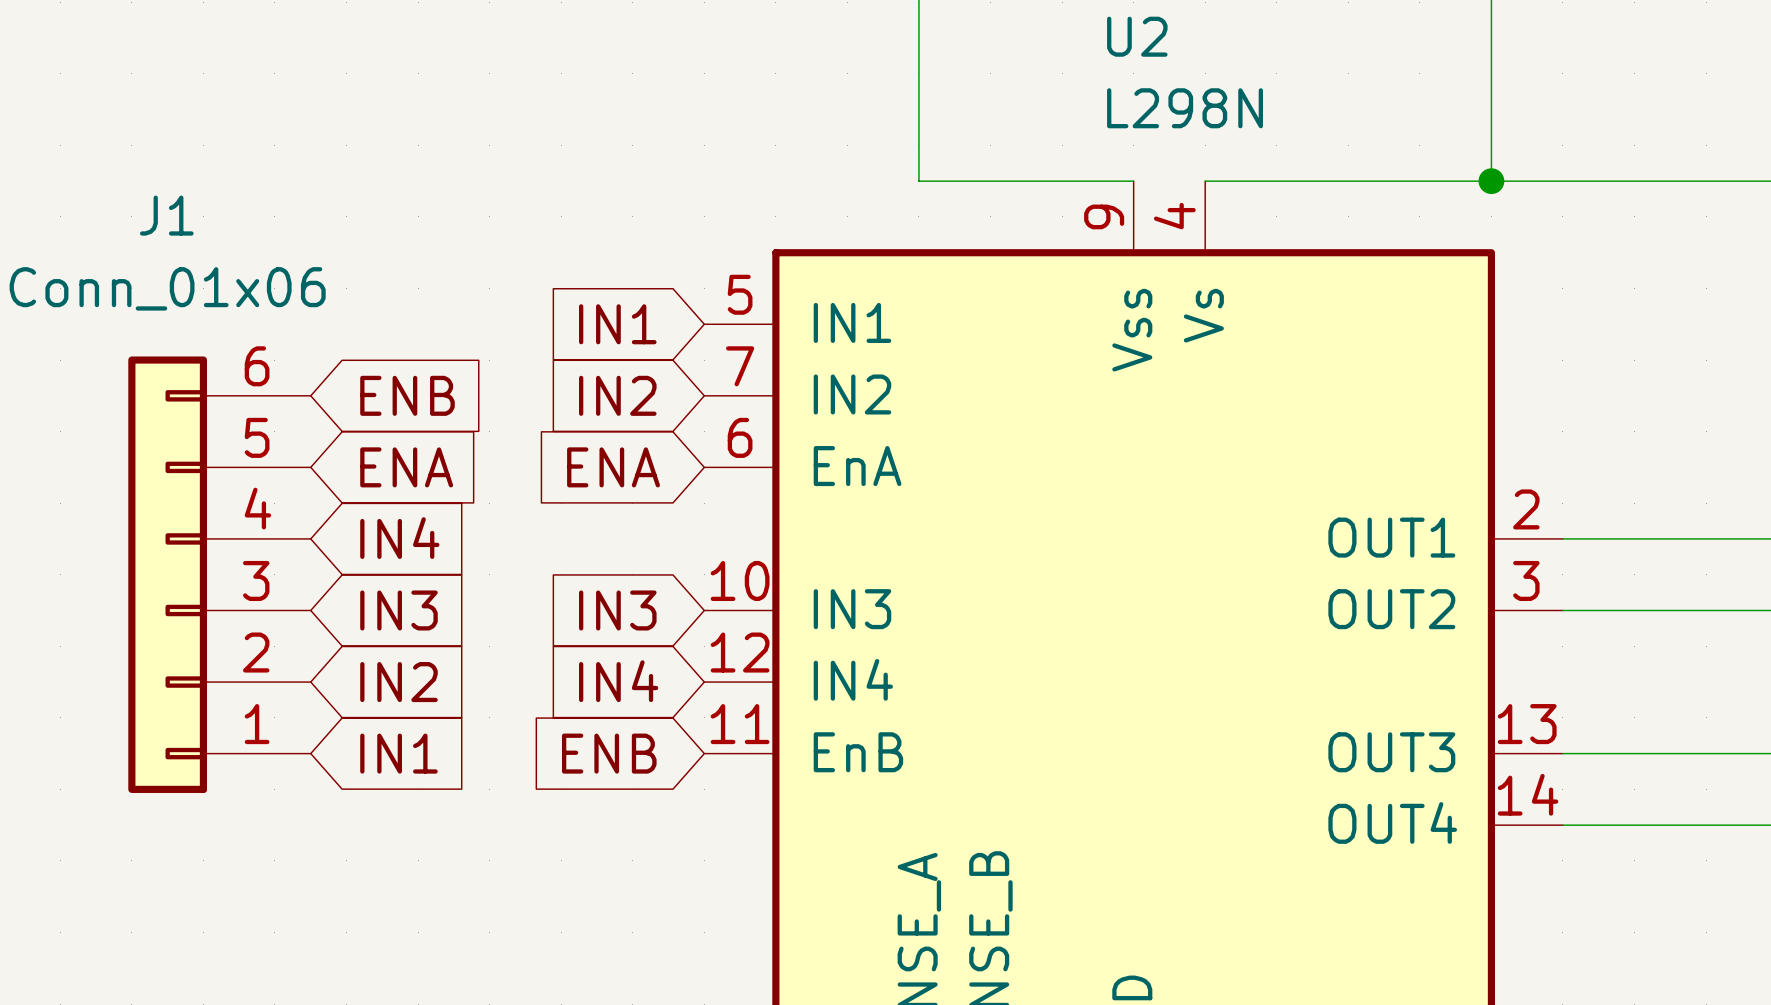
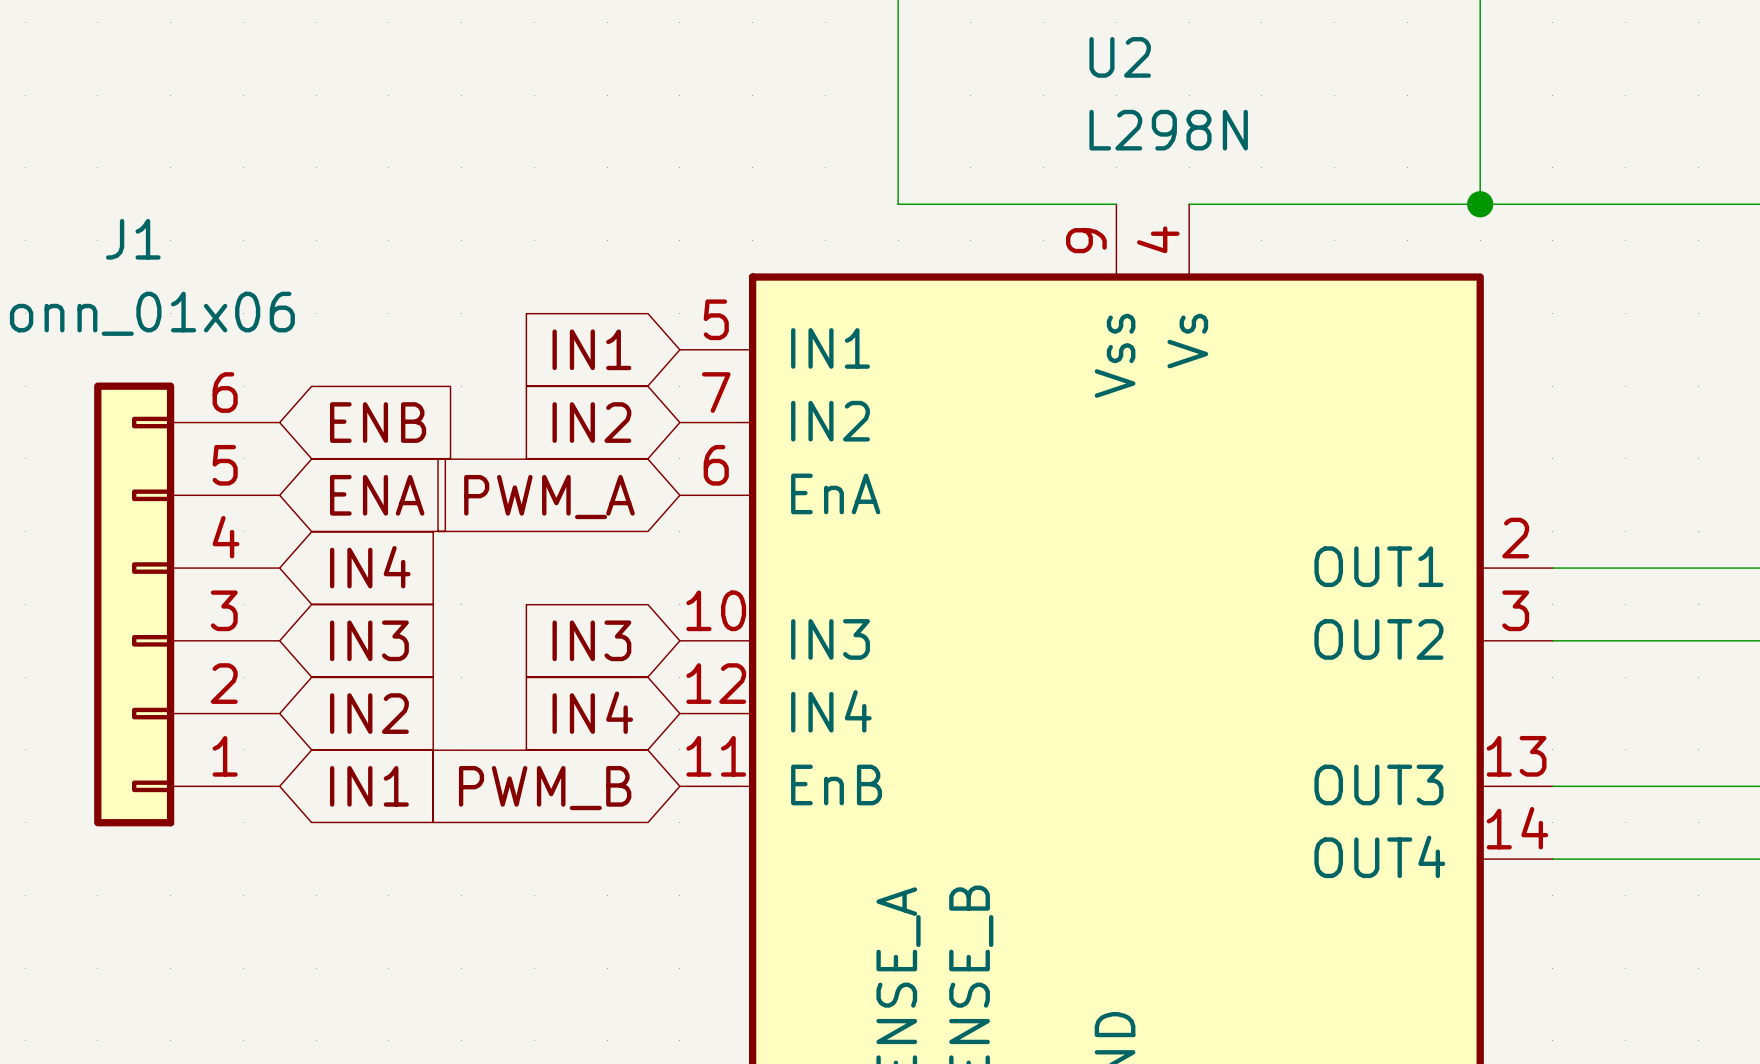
global label: ENA (613, 467) -> PWM_A (549, 497)
global label: ENB (609, 753) -> PWM_B (545, 788)

